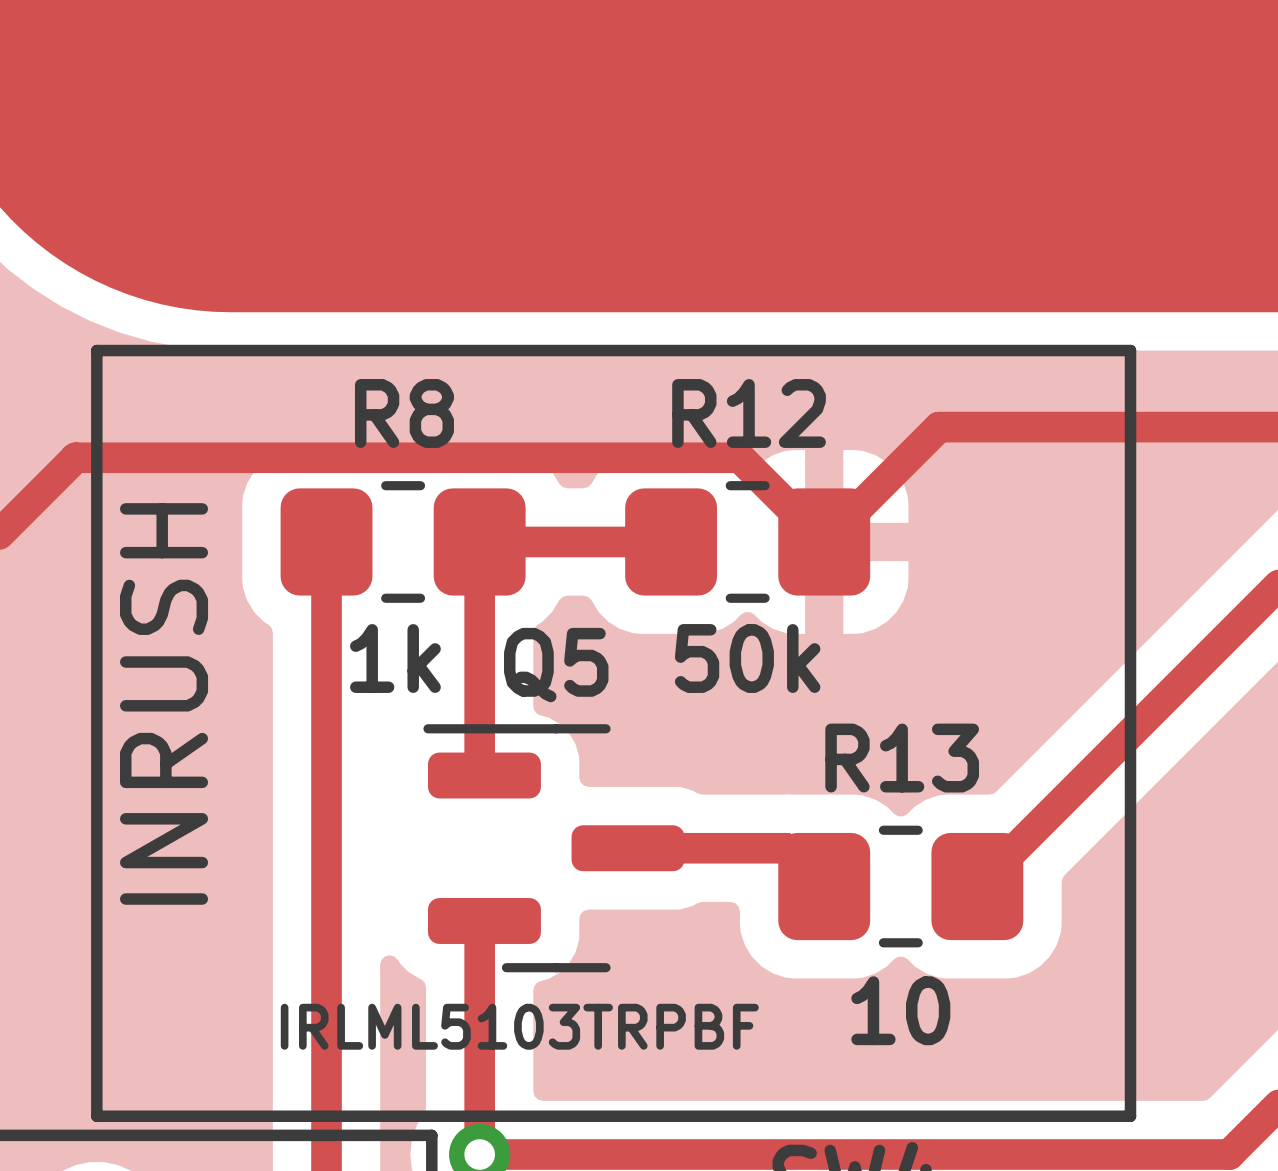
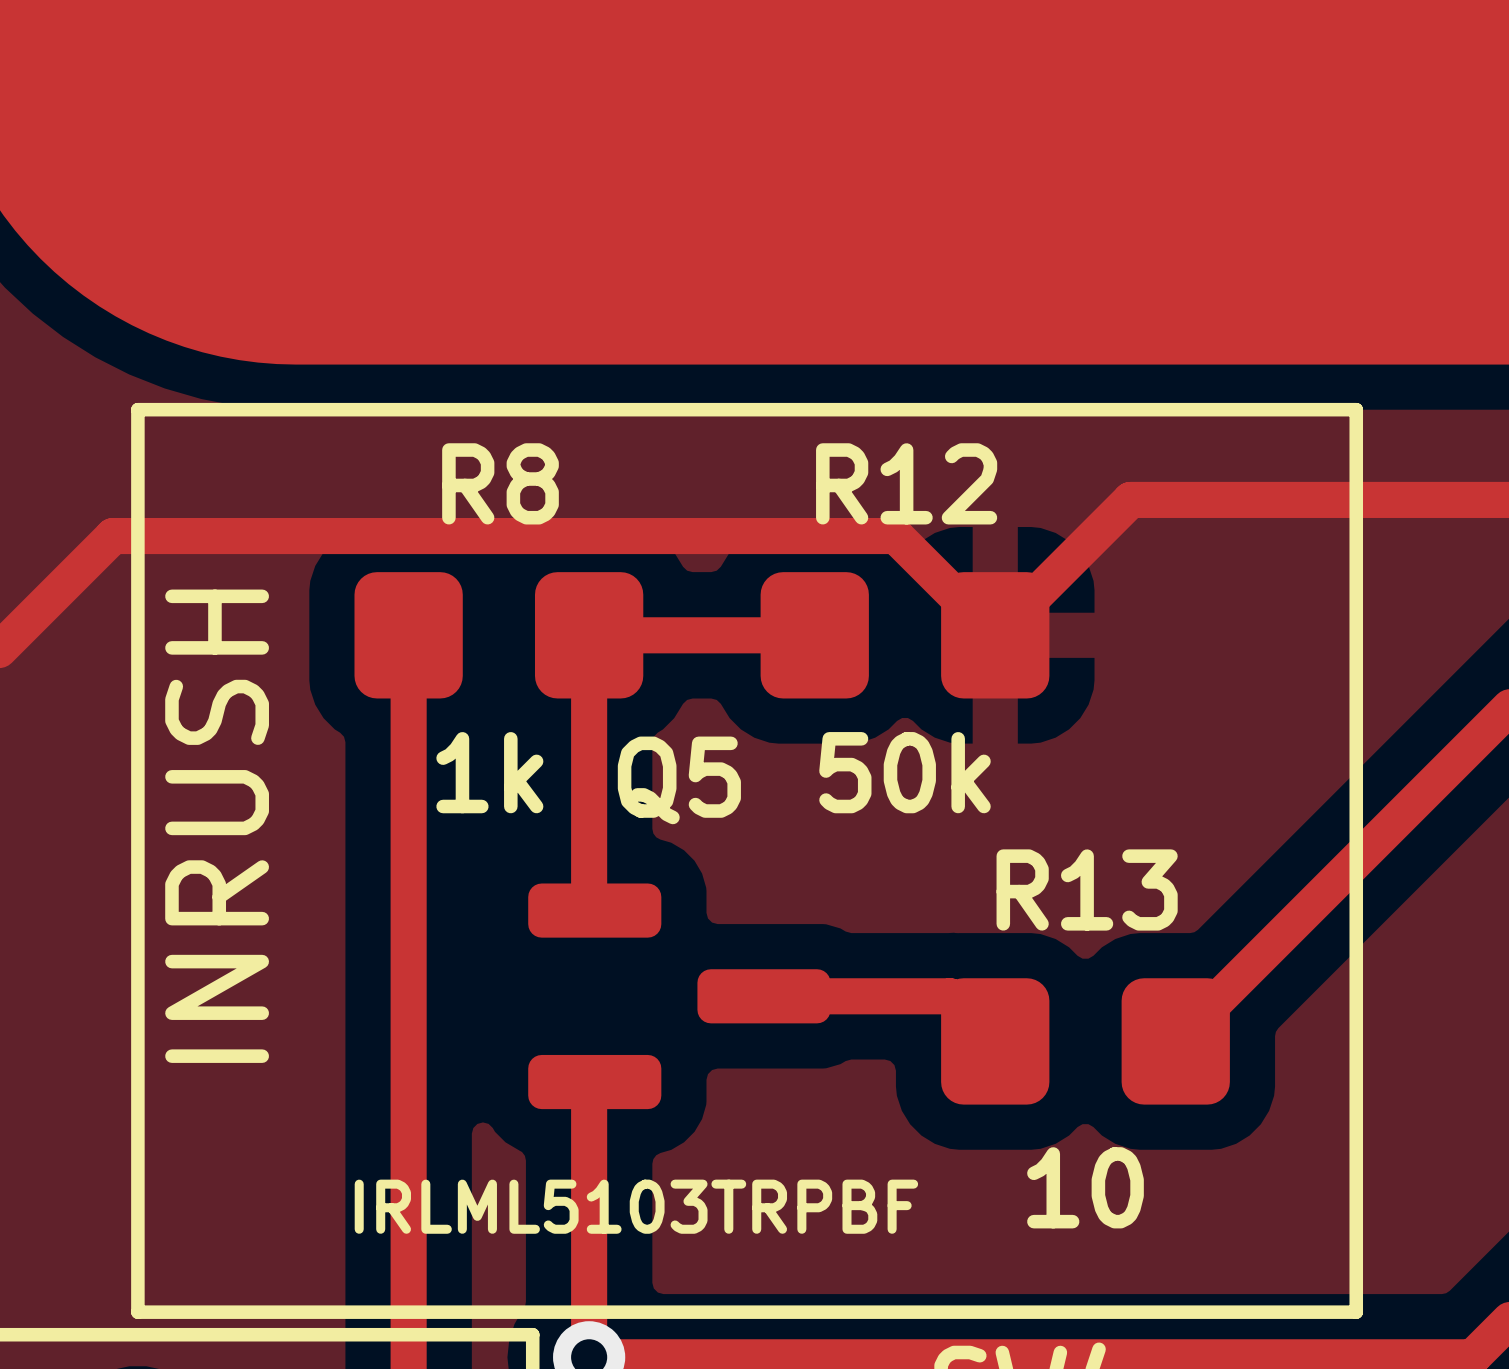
R8 footprint: [280, 481, 526, 603] -> [354, 572, 644, 699]
R12 footprint: [625, 481, 871, 603] -> [760, 572, 1050, 699]
Q5 footprint: [423, 724, 685, 973] -> [528, 883, 831, 1110]
R13 footprint: [778, 825, 1024, 948] -> [941, 978, 1230, 1105]

